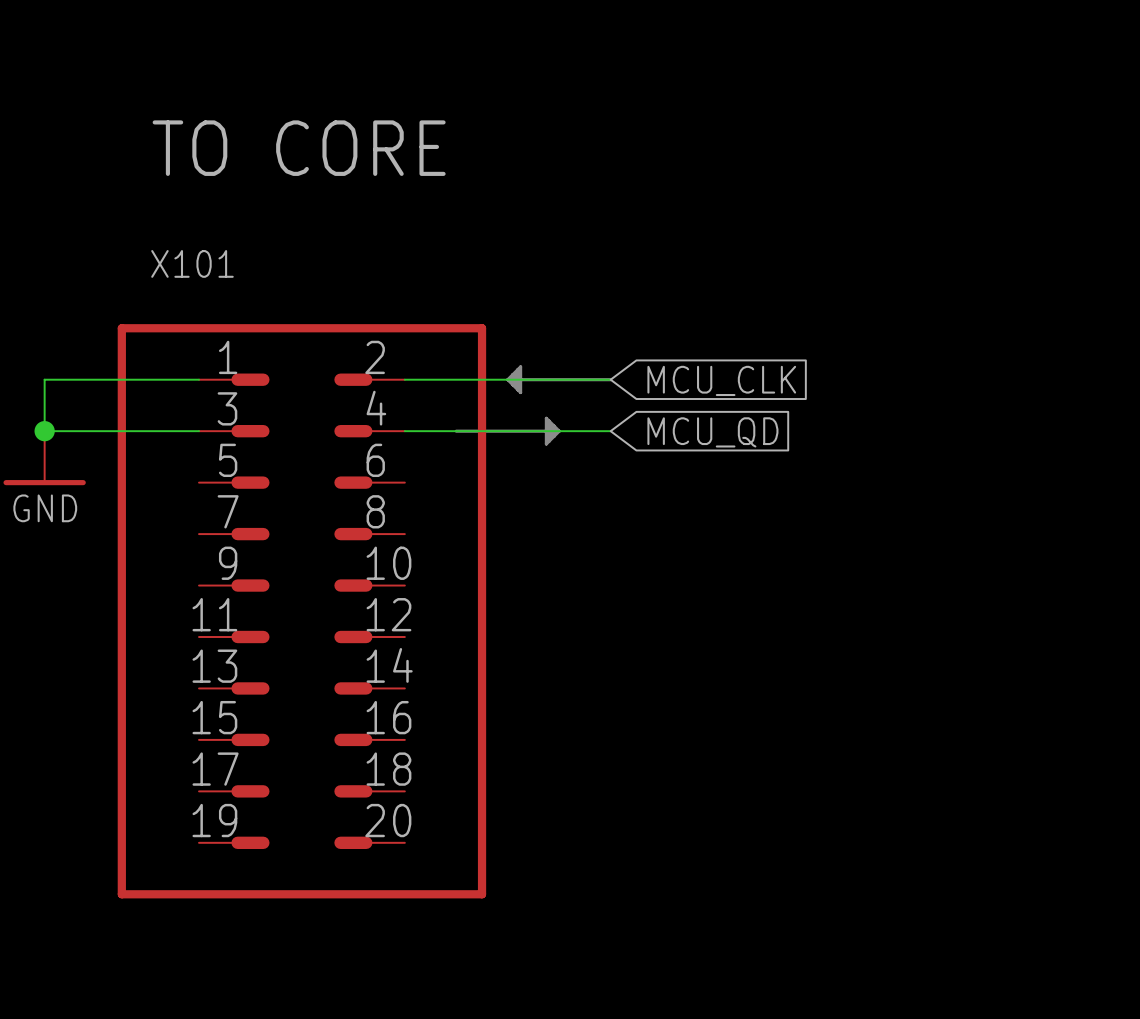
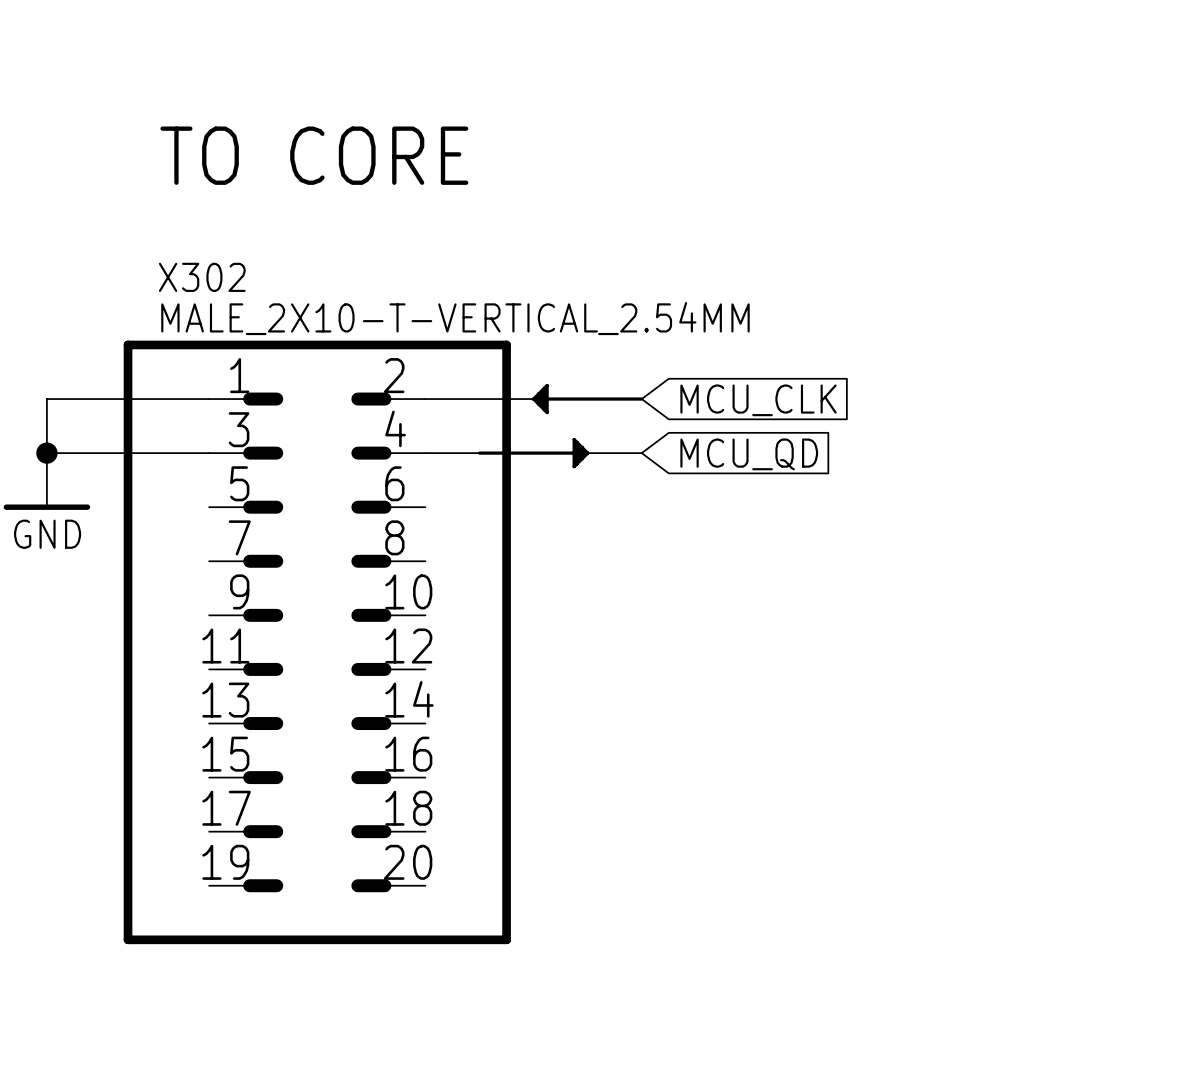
X101 name: X101 (192, 263) -> X302 (202, 277)
X101 value: none -> MALE_2X10-T-VERTICAL_2.54MM (455, 318)

